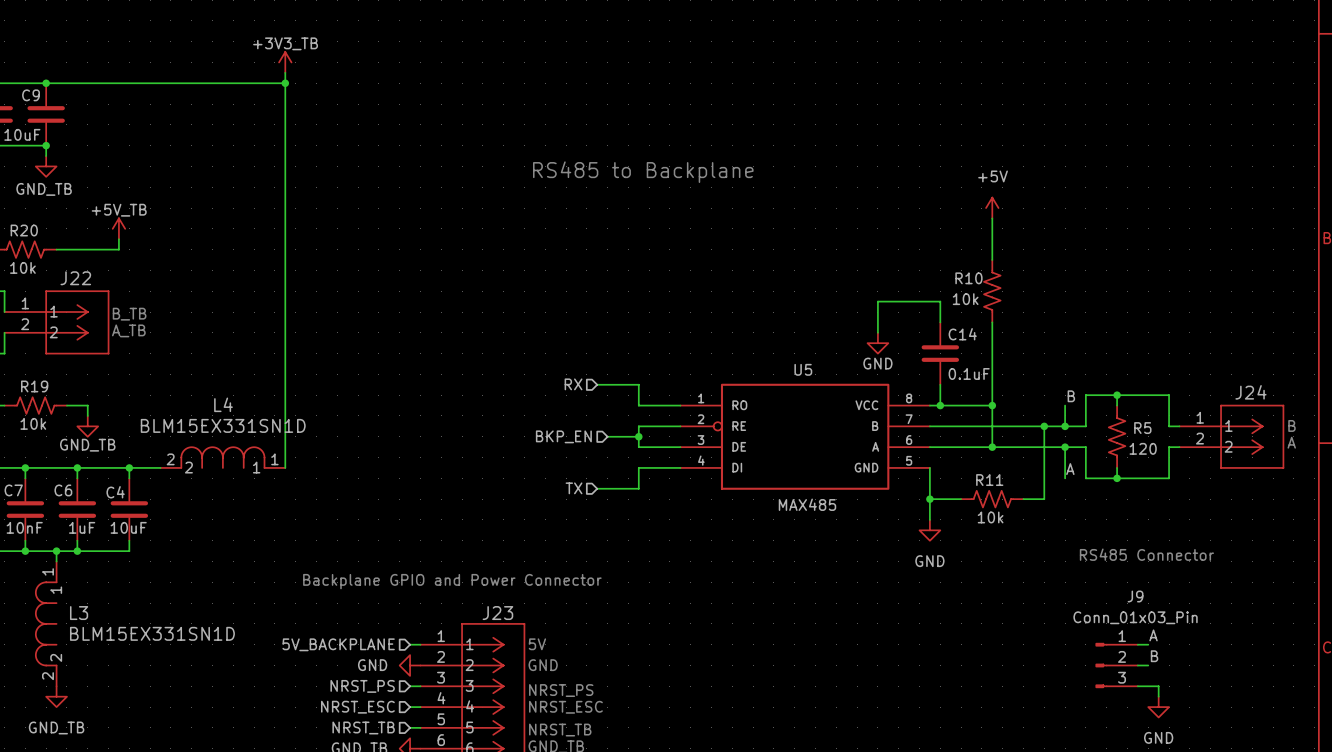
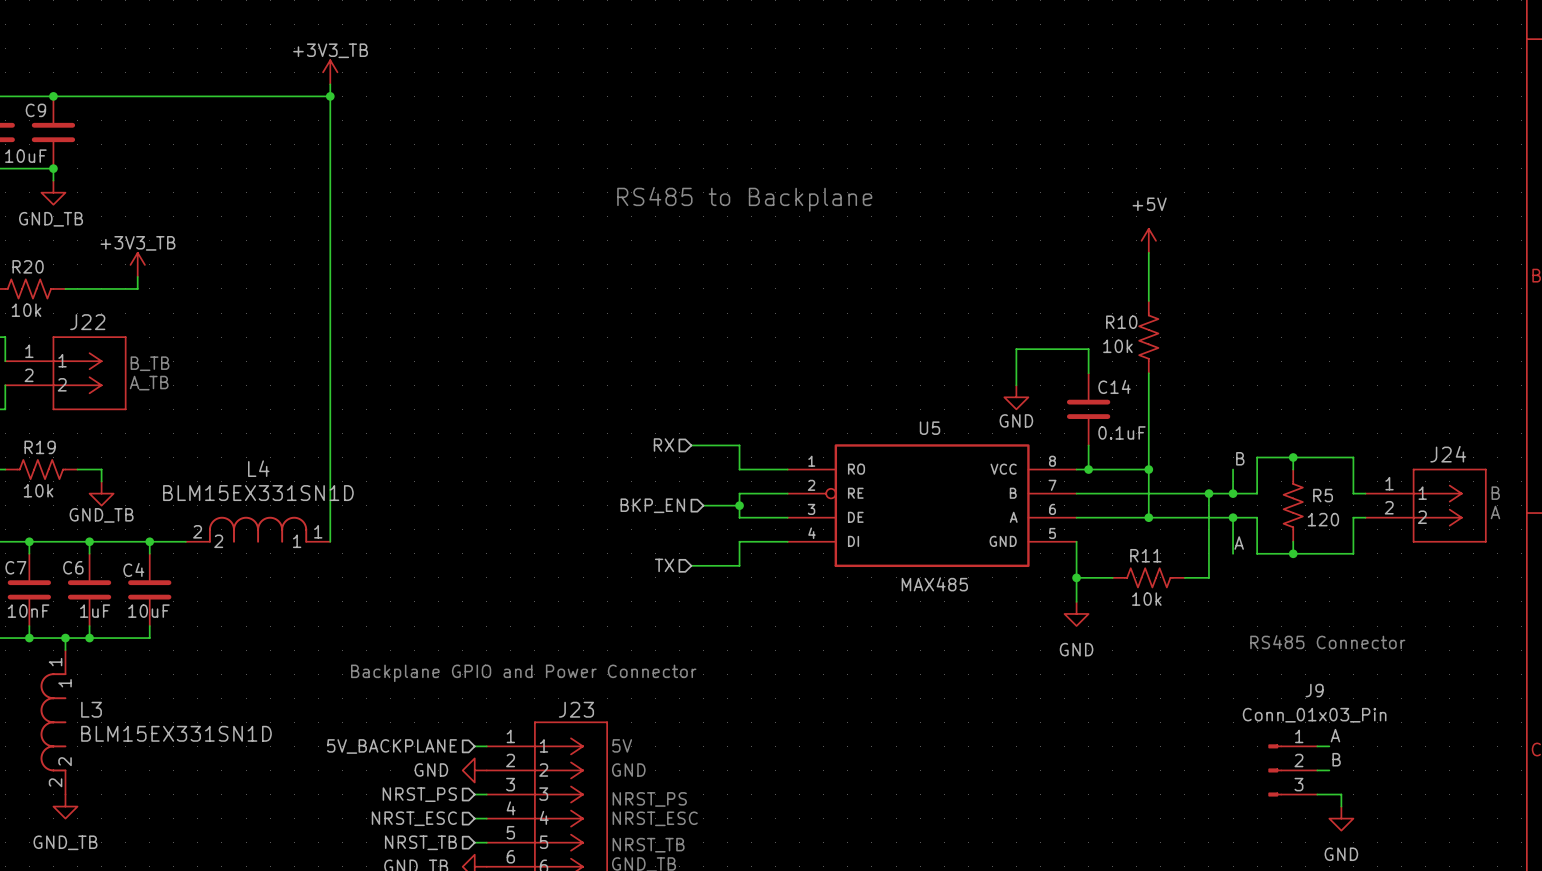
power symbol: +5V_TB (118, 228) -> +3V3_TB (137, 264)

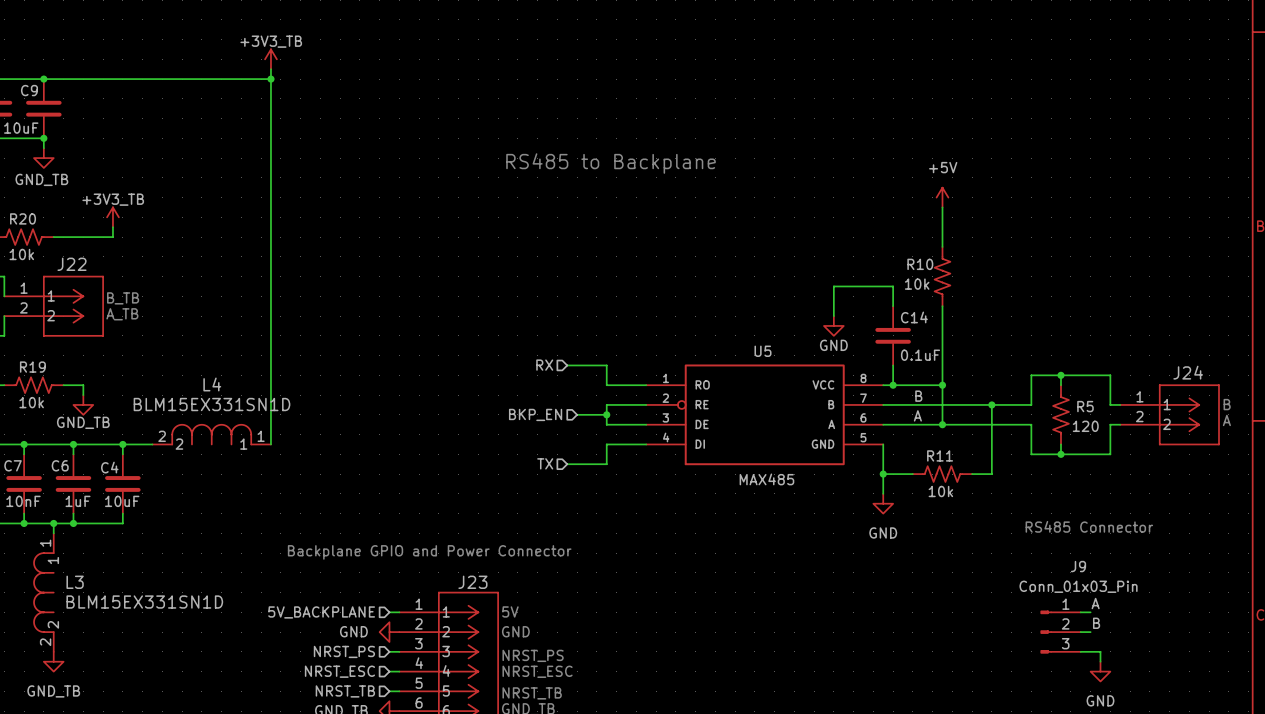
label position: B (1240, 458) -> B (918, 396)
wire: (1233, 469) (1233, 493) -> none
junction: (1233, 493) -> none
wire: (1233, 517) (1233, 553) -> none
junction: (1233, 517) -> none
label position: A (1239, 543) -> A (917, 415)

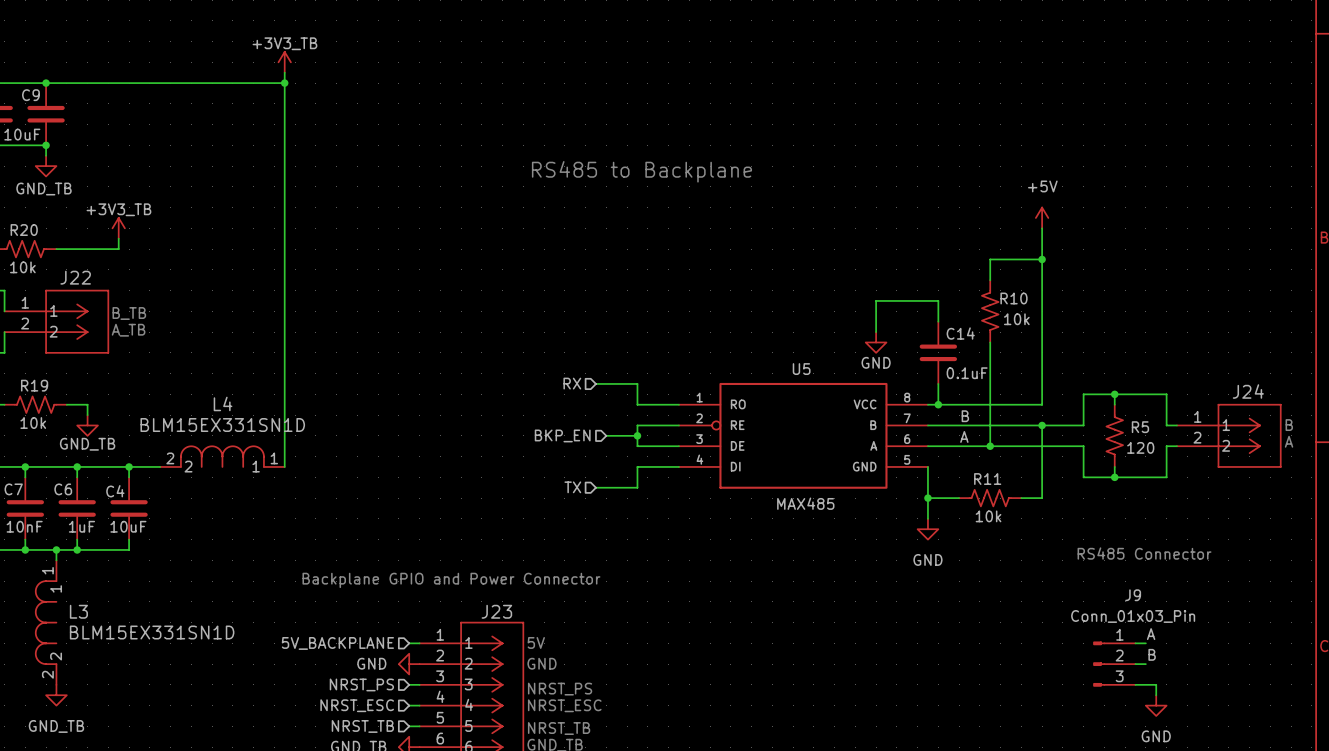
power symbol position: +5V (942, 197) -> +5V (1042, 217)
wire: (942, 207) (942, 246) -> none
wire: none -> (1042, 228) (1042, 404) (990, 404)
wire: none -> (1042, 259) (990, 259) (990, 280)
junction: none -> (1042, 259)
R10 flip: as is (942, 276) -> left-right (990, 311)
junction: (942, 385) -> none

